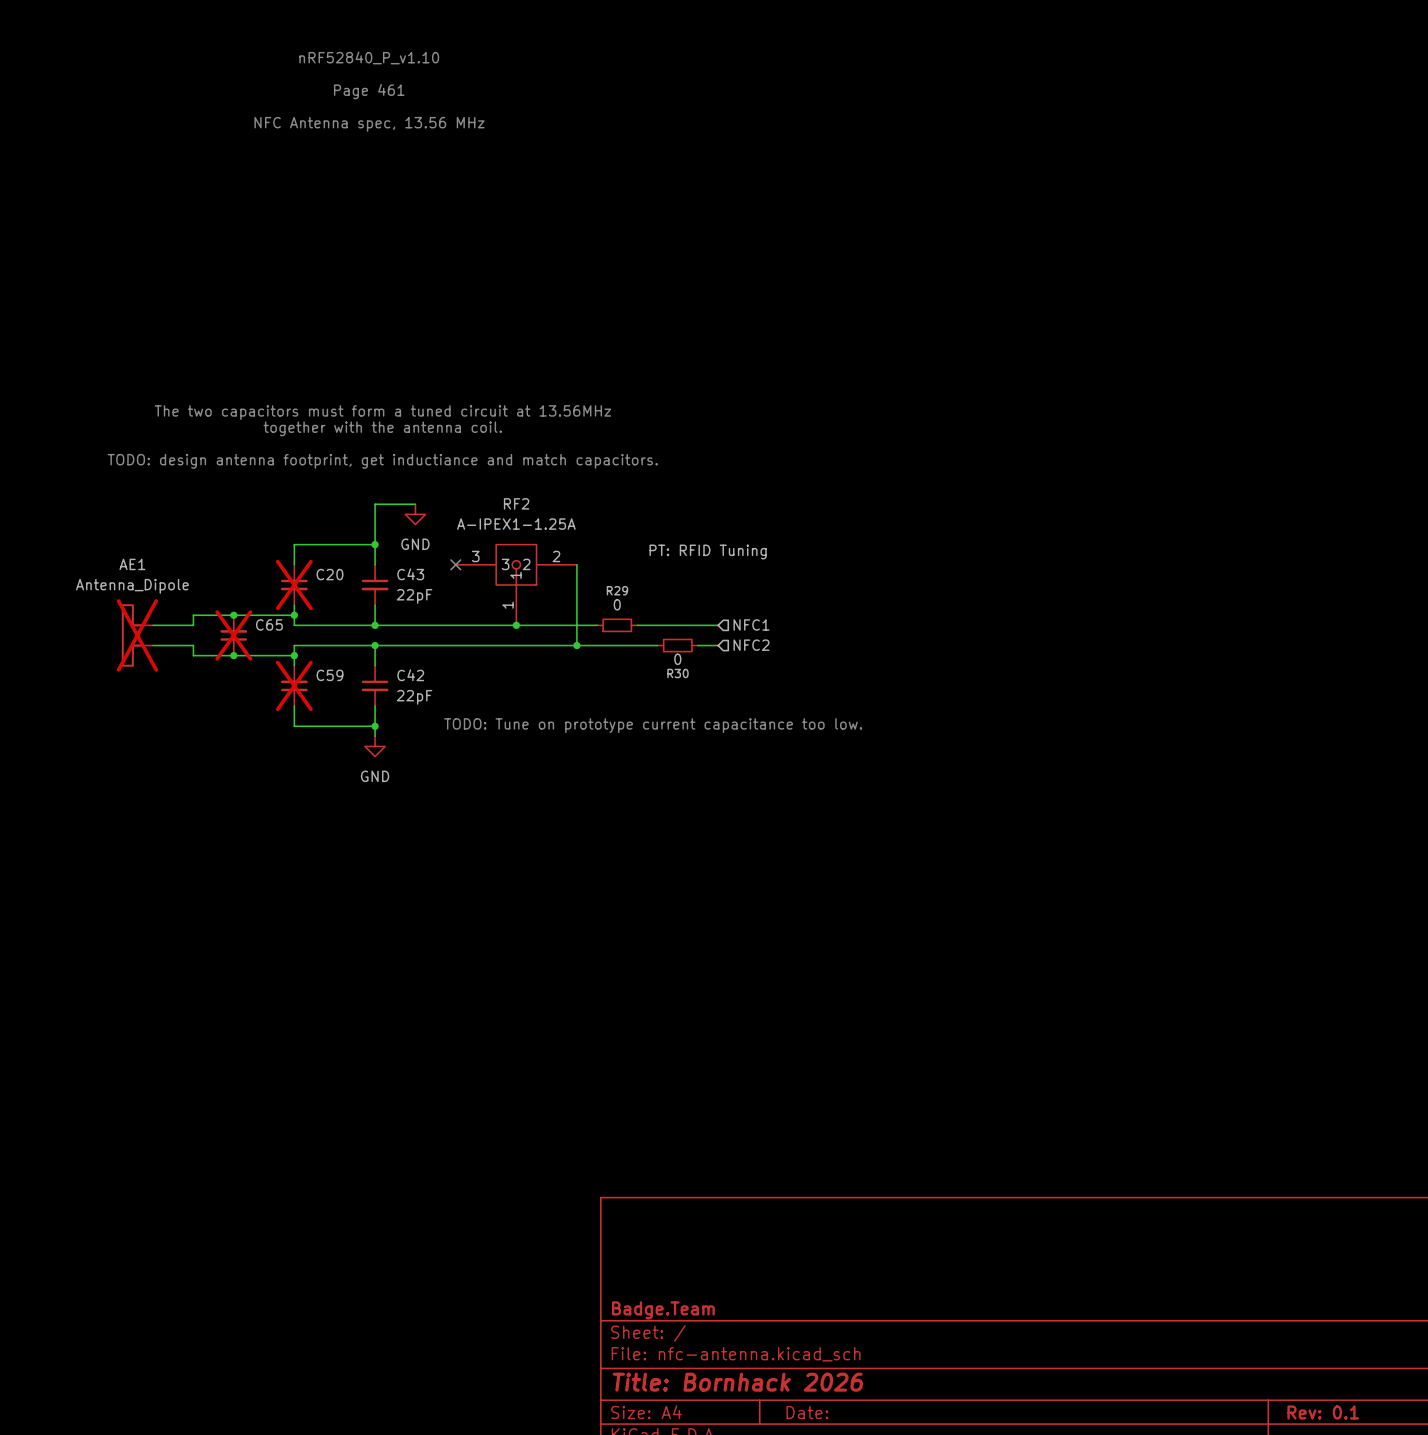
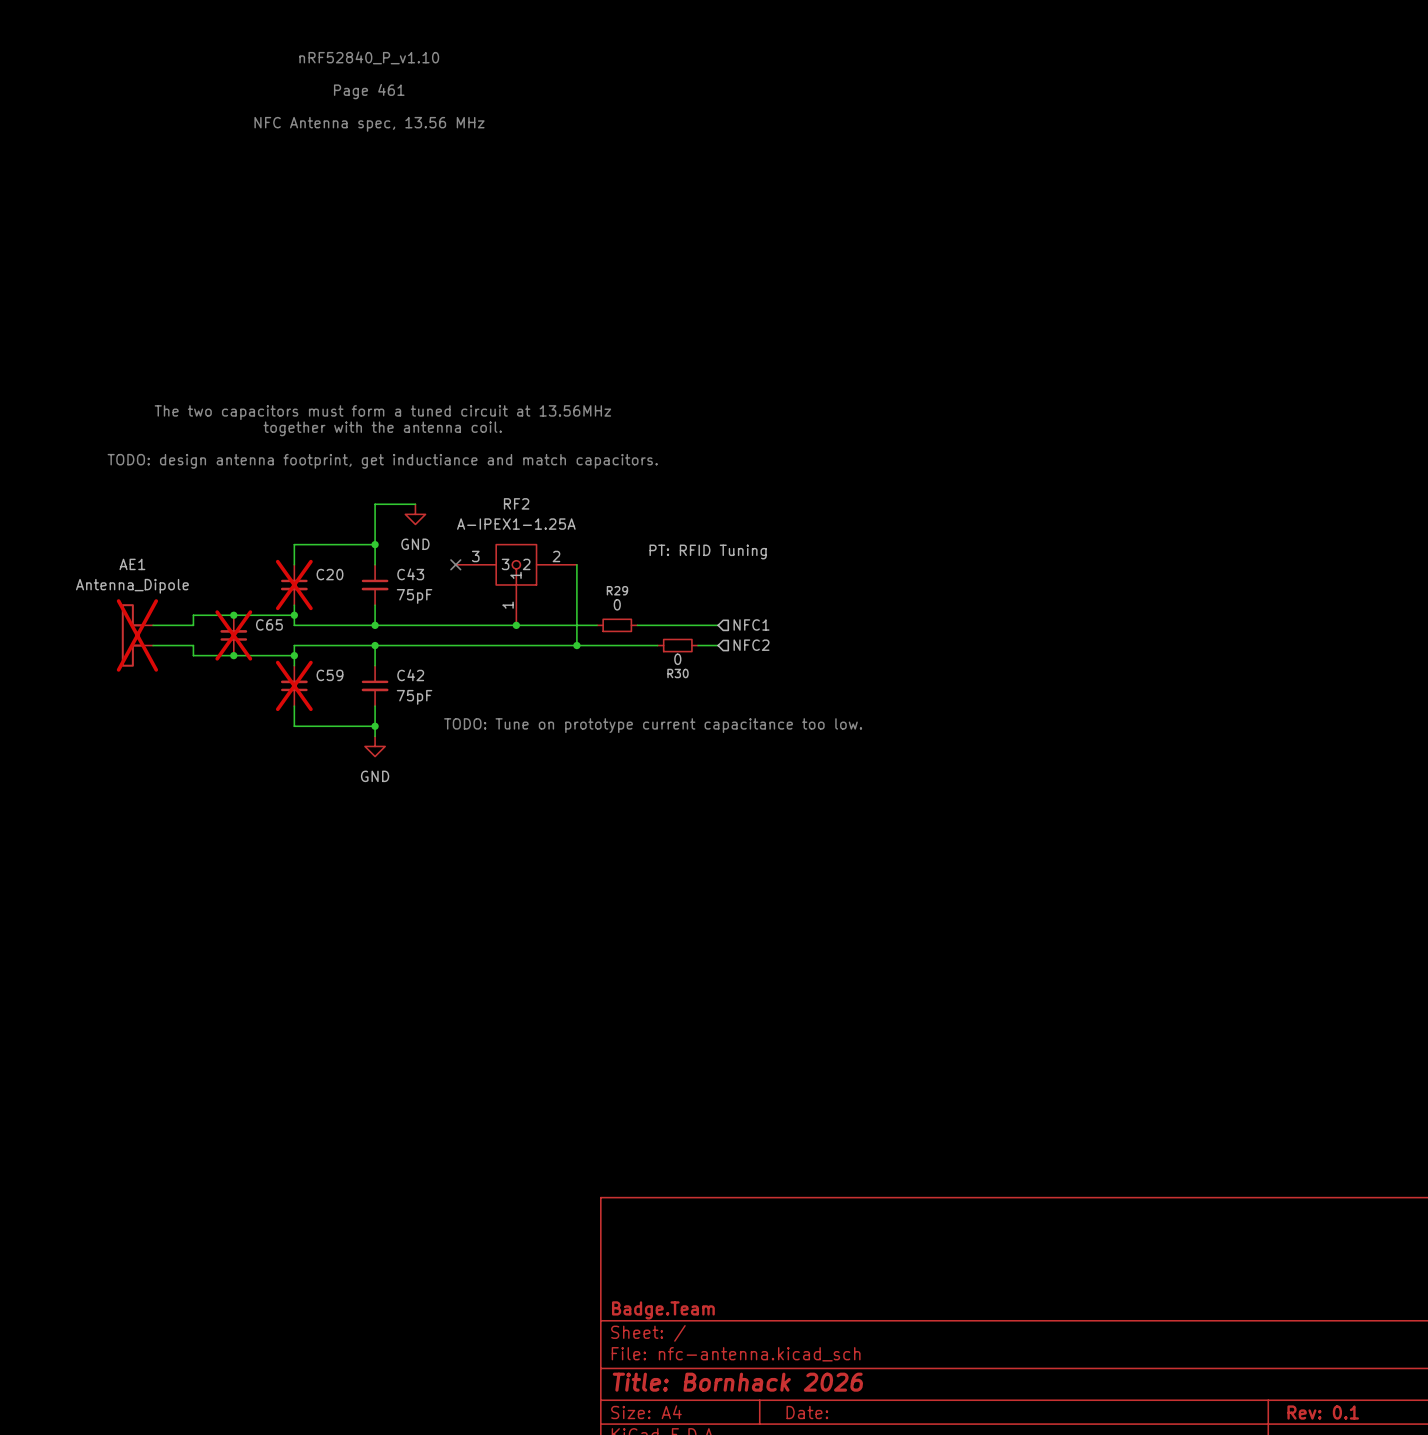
C43 value: 22pF (414, 596) -> 75pF (414, 596)
C42 value: 22pF (414, 697) -> 75pF (414, 697)

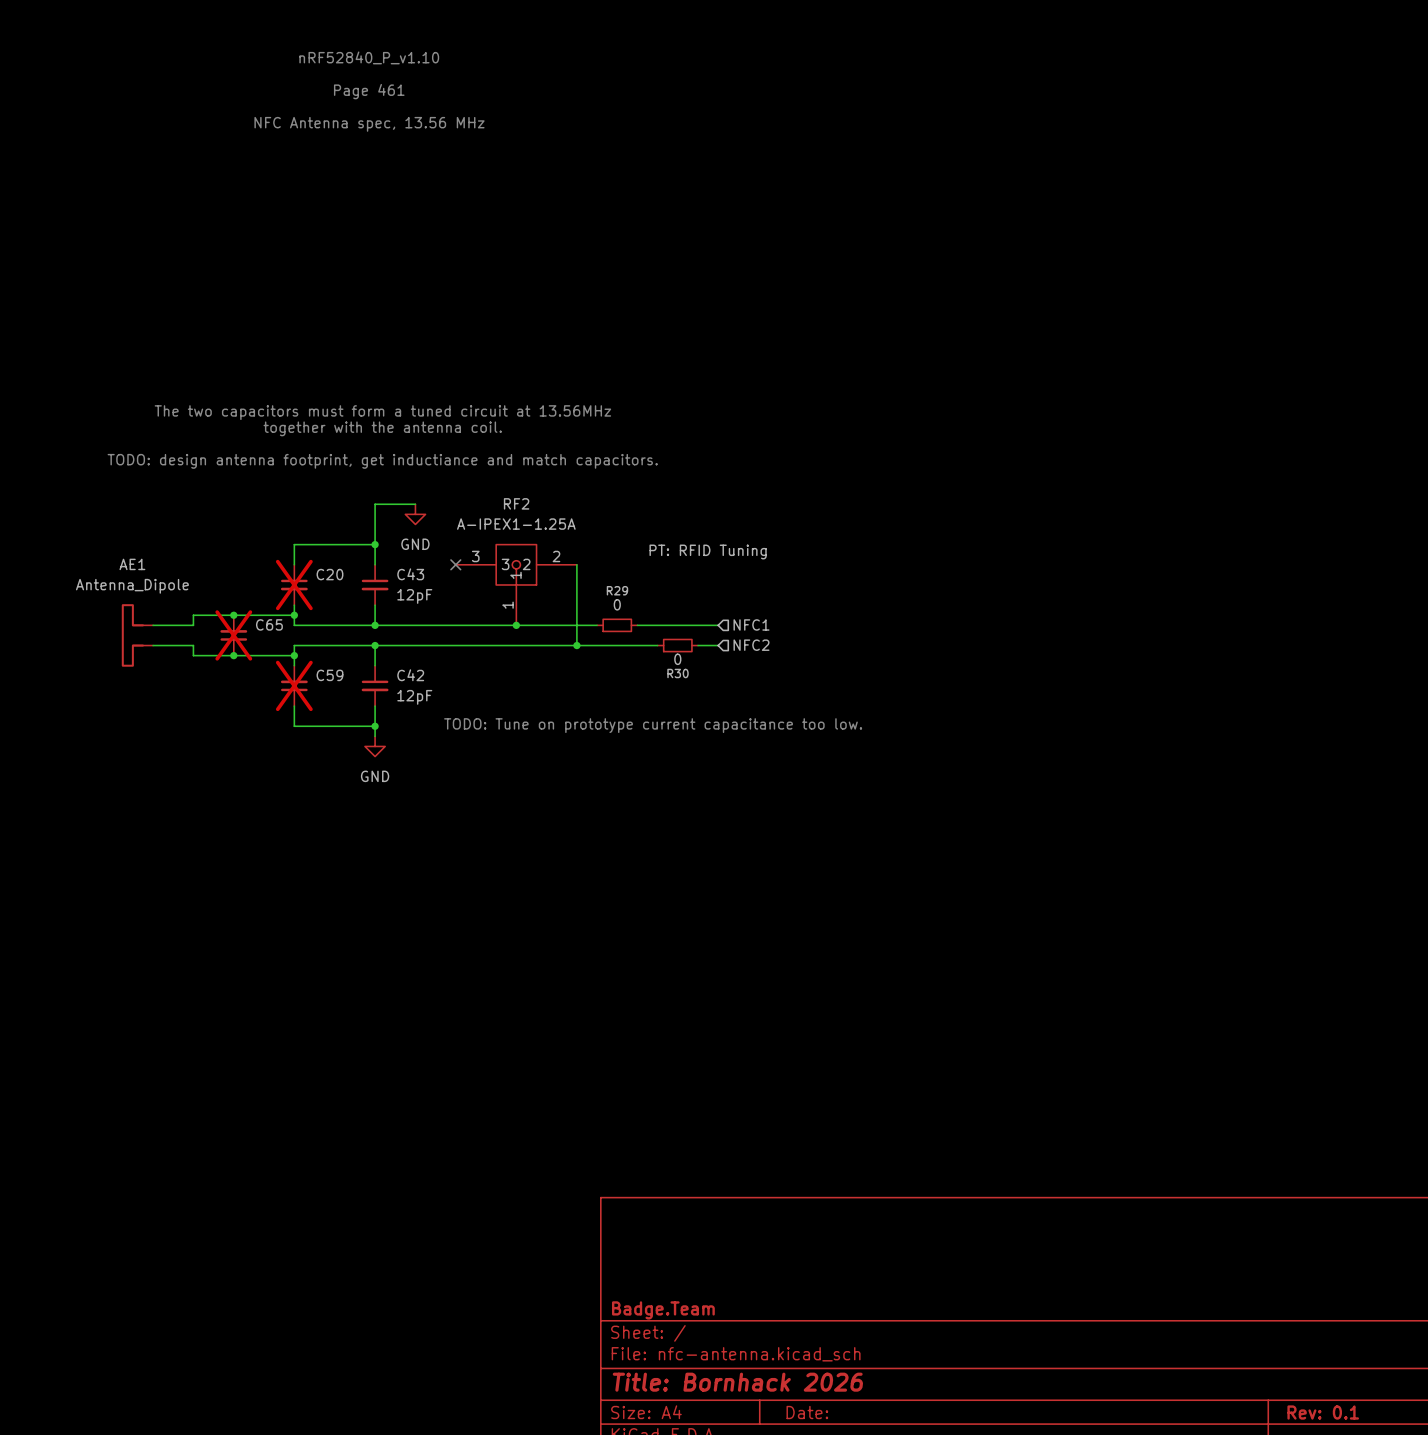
C43 value: 75pF (414, 596) -> 12pF (414, 596)
AE1 do-not-place cross: (137, 635) -> none
C42 value: 75pF (414, 697) -> 12pF (414, 697)

